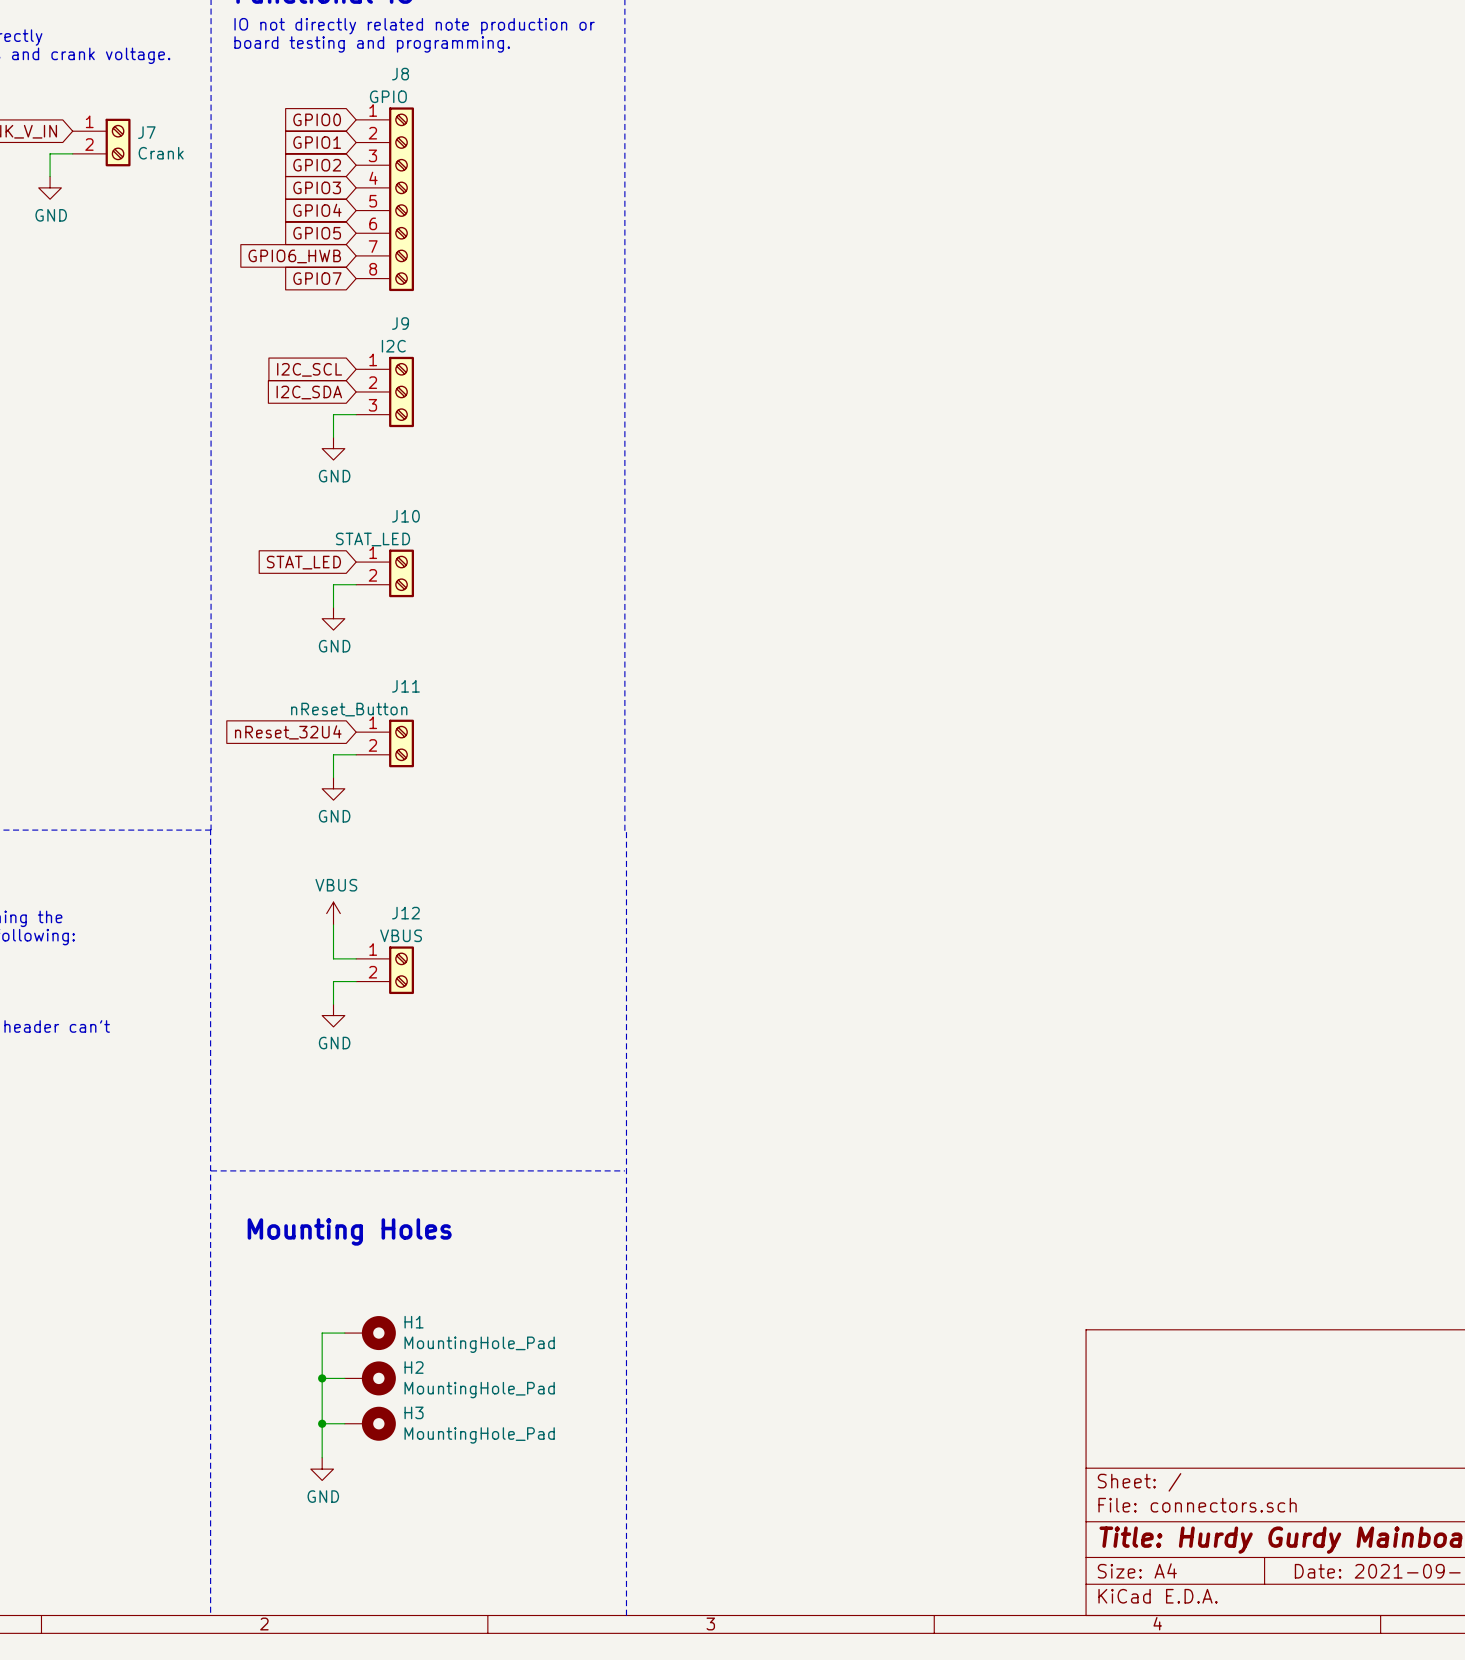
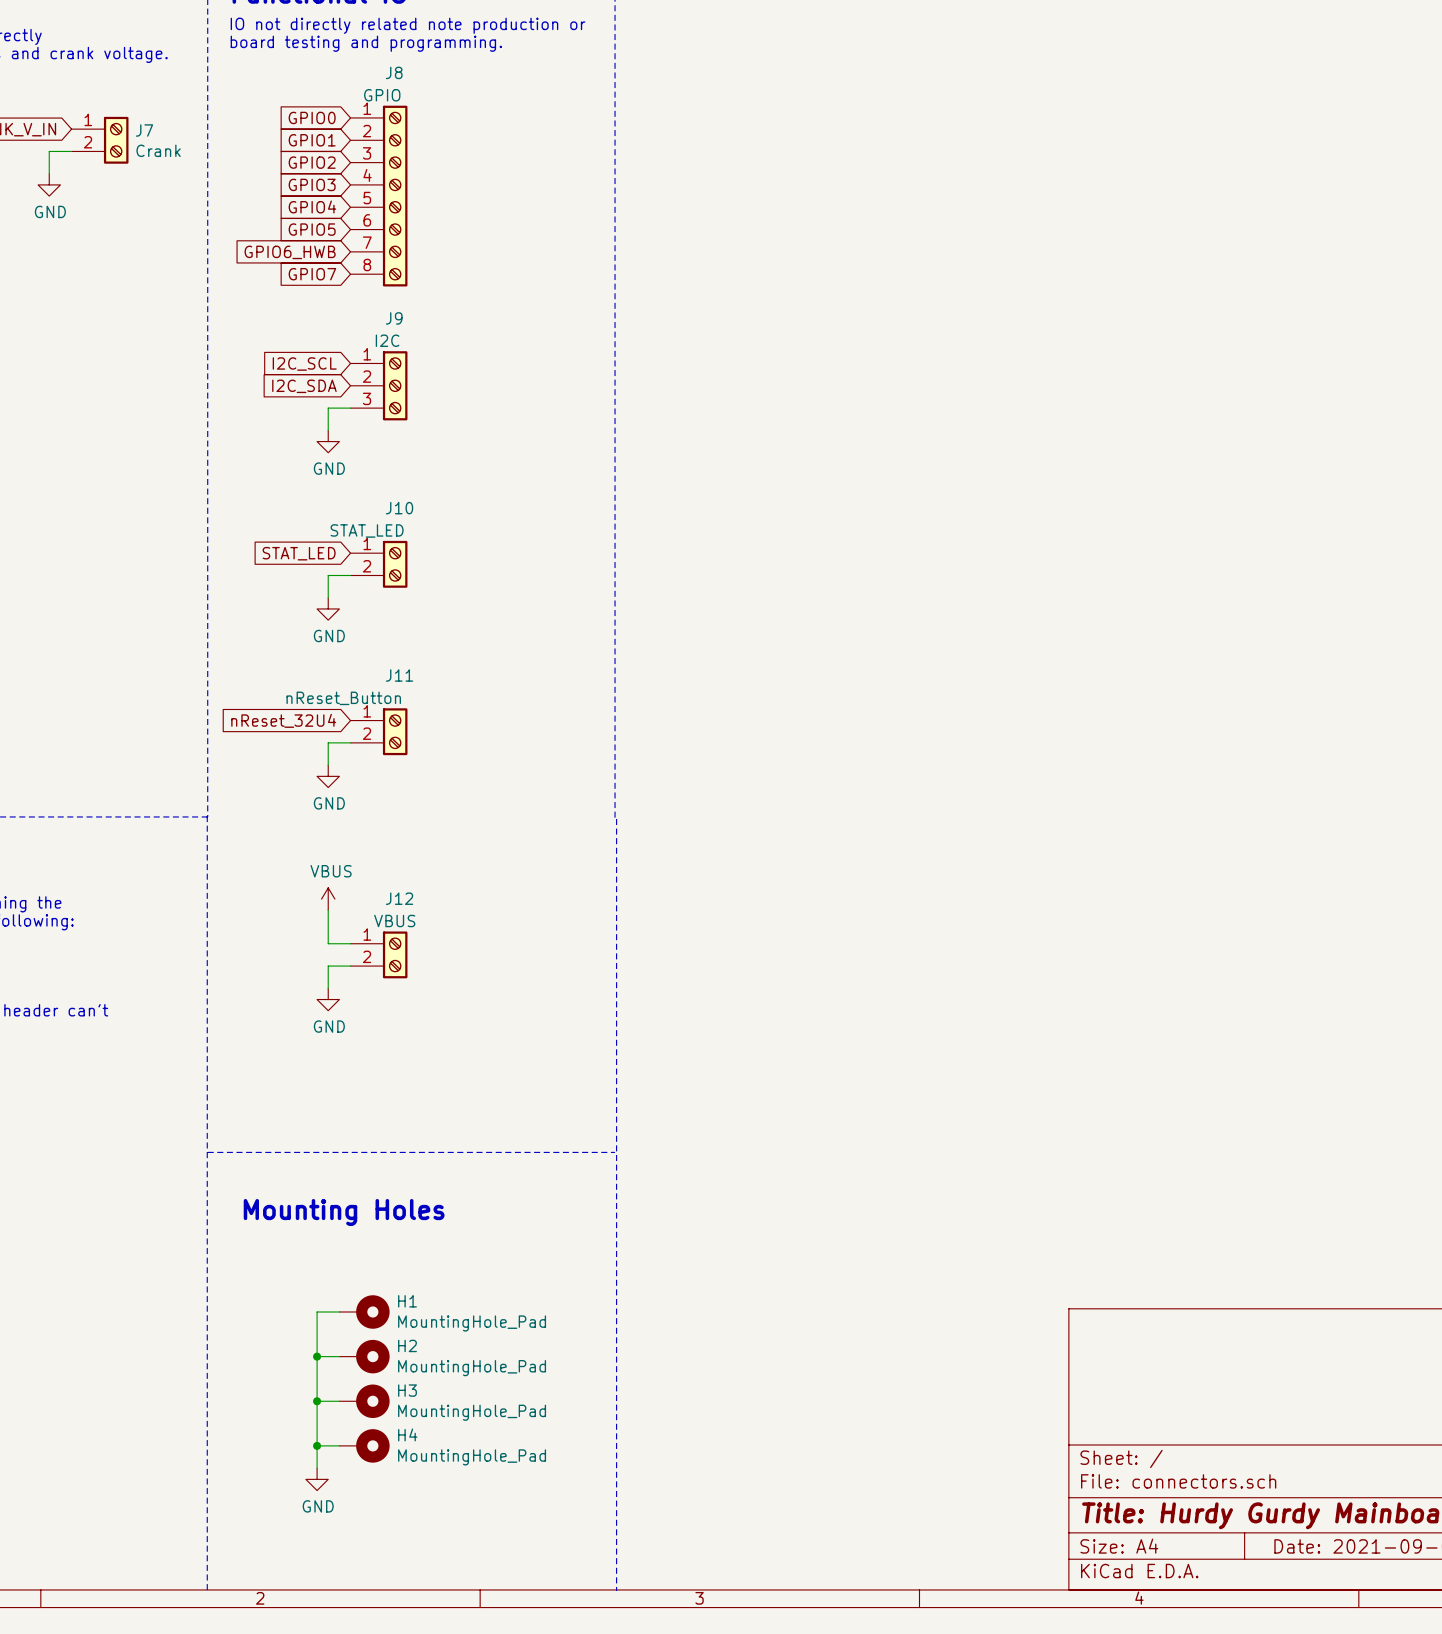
wire: none -> (317, 1434) (317, 1468)
wire: none -> (317, 1445) (339, 1445)
power symbol position: GND (322, 1469) -> GND (317, 1479)
junction: none -> (317, 1445)
H4: none -> MountingHole_Pad (364, 1445)

